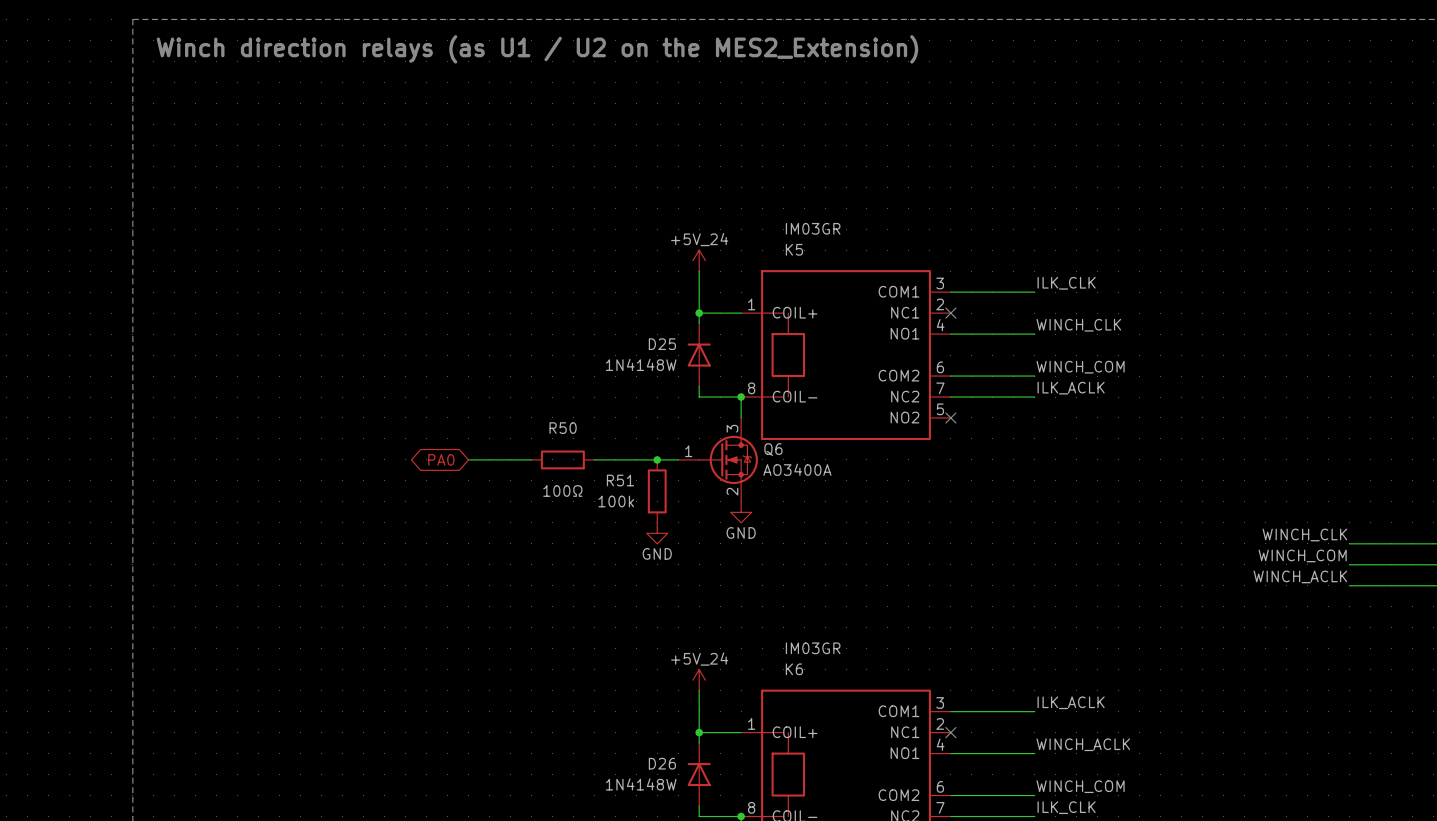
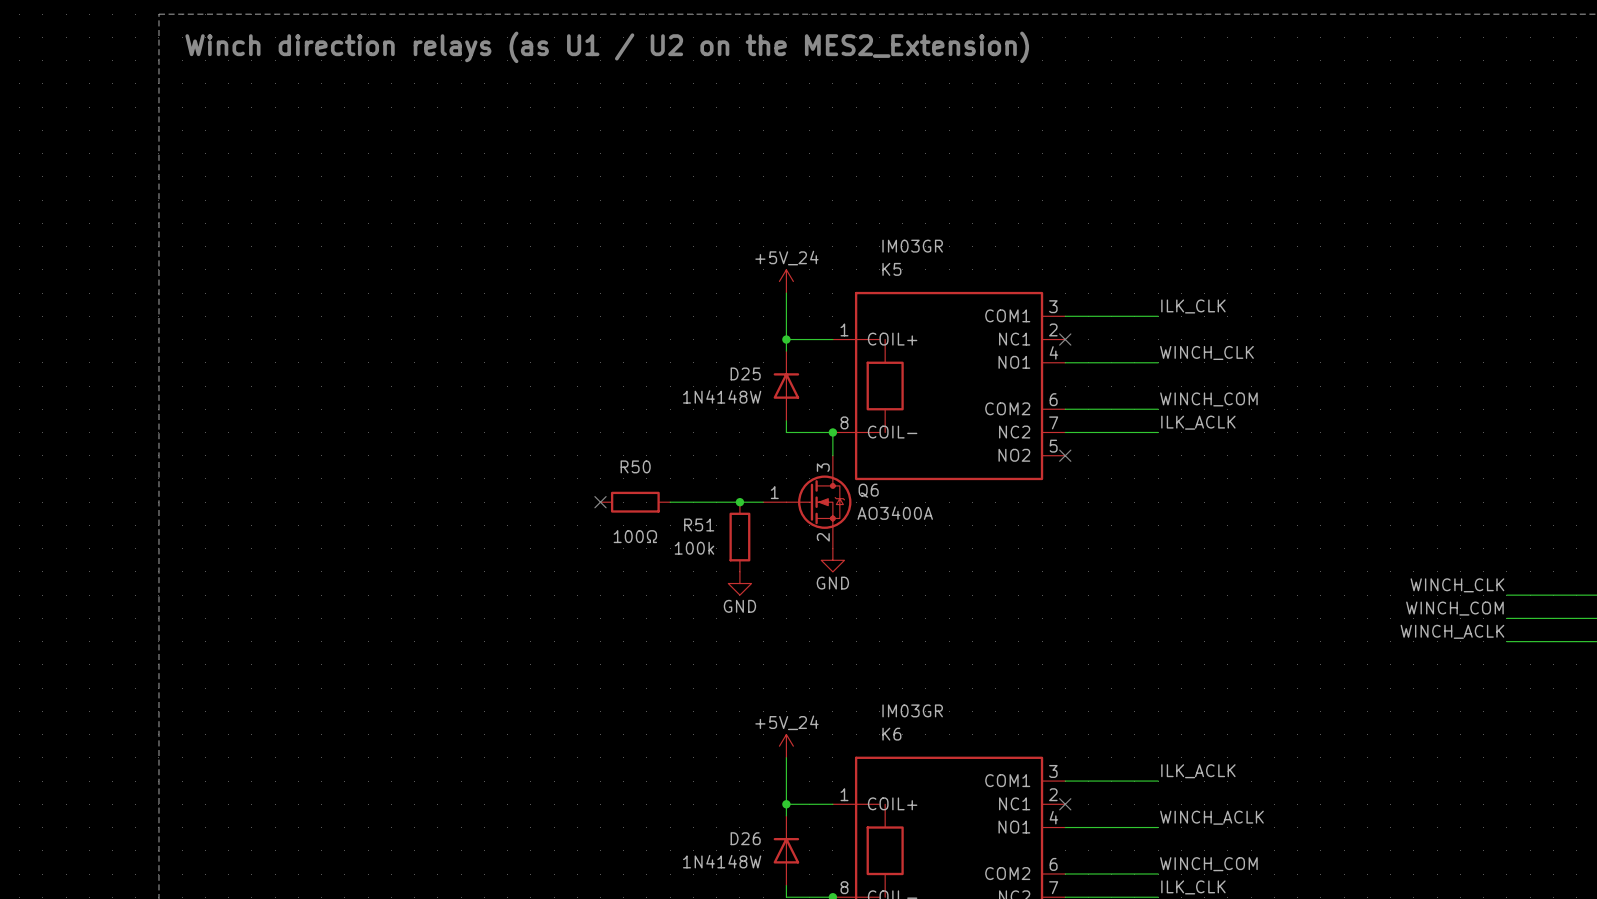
global label: PA0 (441, 459) -> none
wire: (468, 459) (531, 459) -> none
no-connect mark: none -> (600, 502)

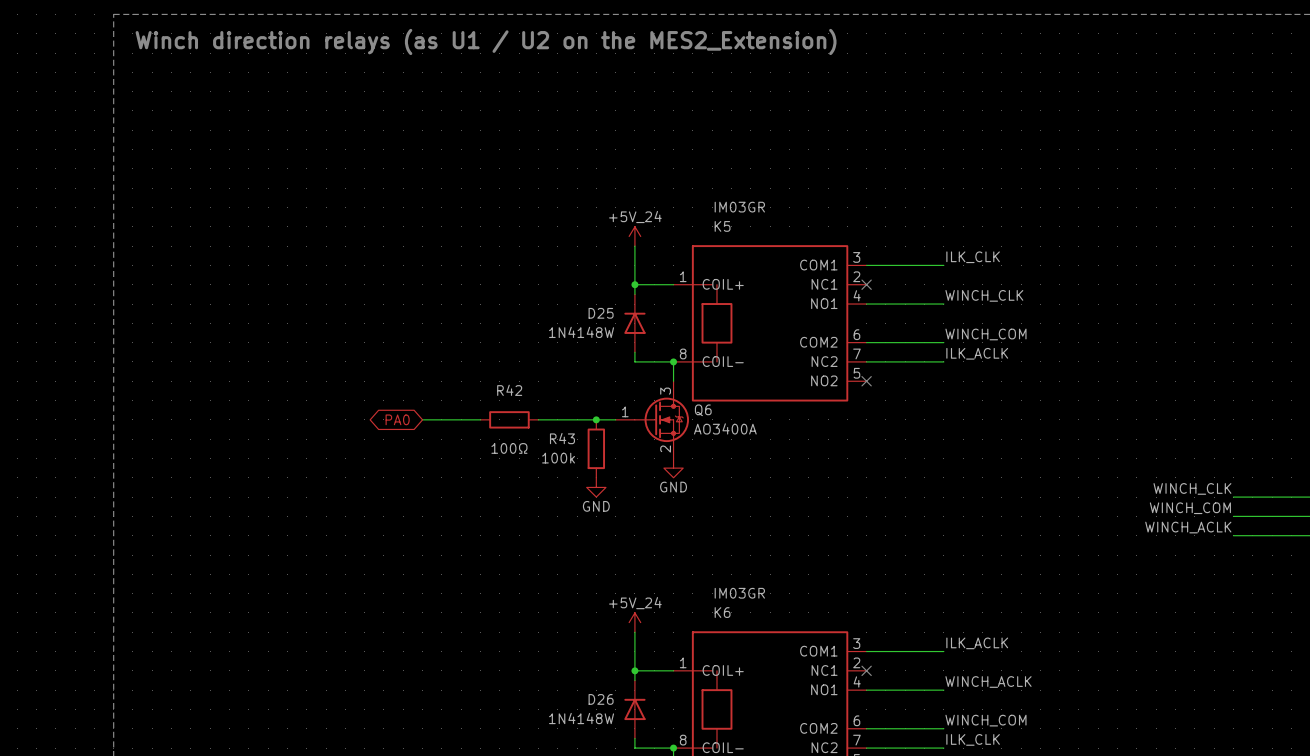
R50 name: R50 (635, 466) -> R42 (509, 390)
global label: none -> PA0 (397, 419)
wire: none -> (422, 419) (480, 419)
no-connect mark: (600, 502) -> none
R51 name: R51 (699, 525) -> R43 (562, 438)

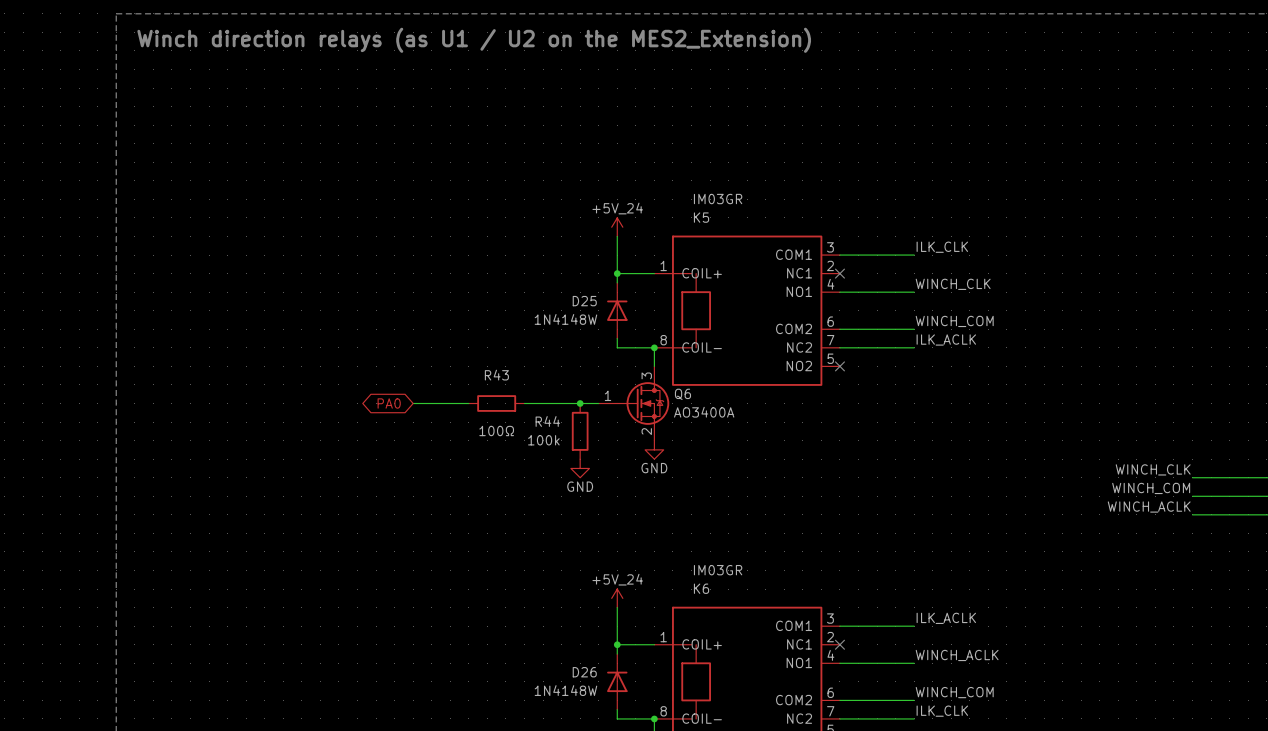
R42 name: R42 (509, 390) -> R43 (496, 375)
R43 name: R43 (562, 438) -> R44 (547, 421)

